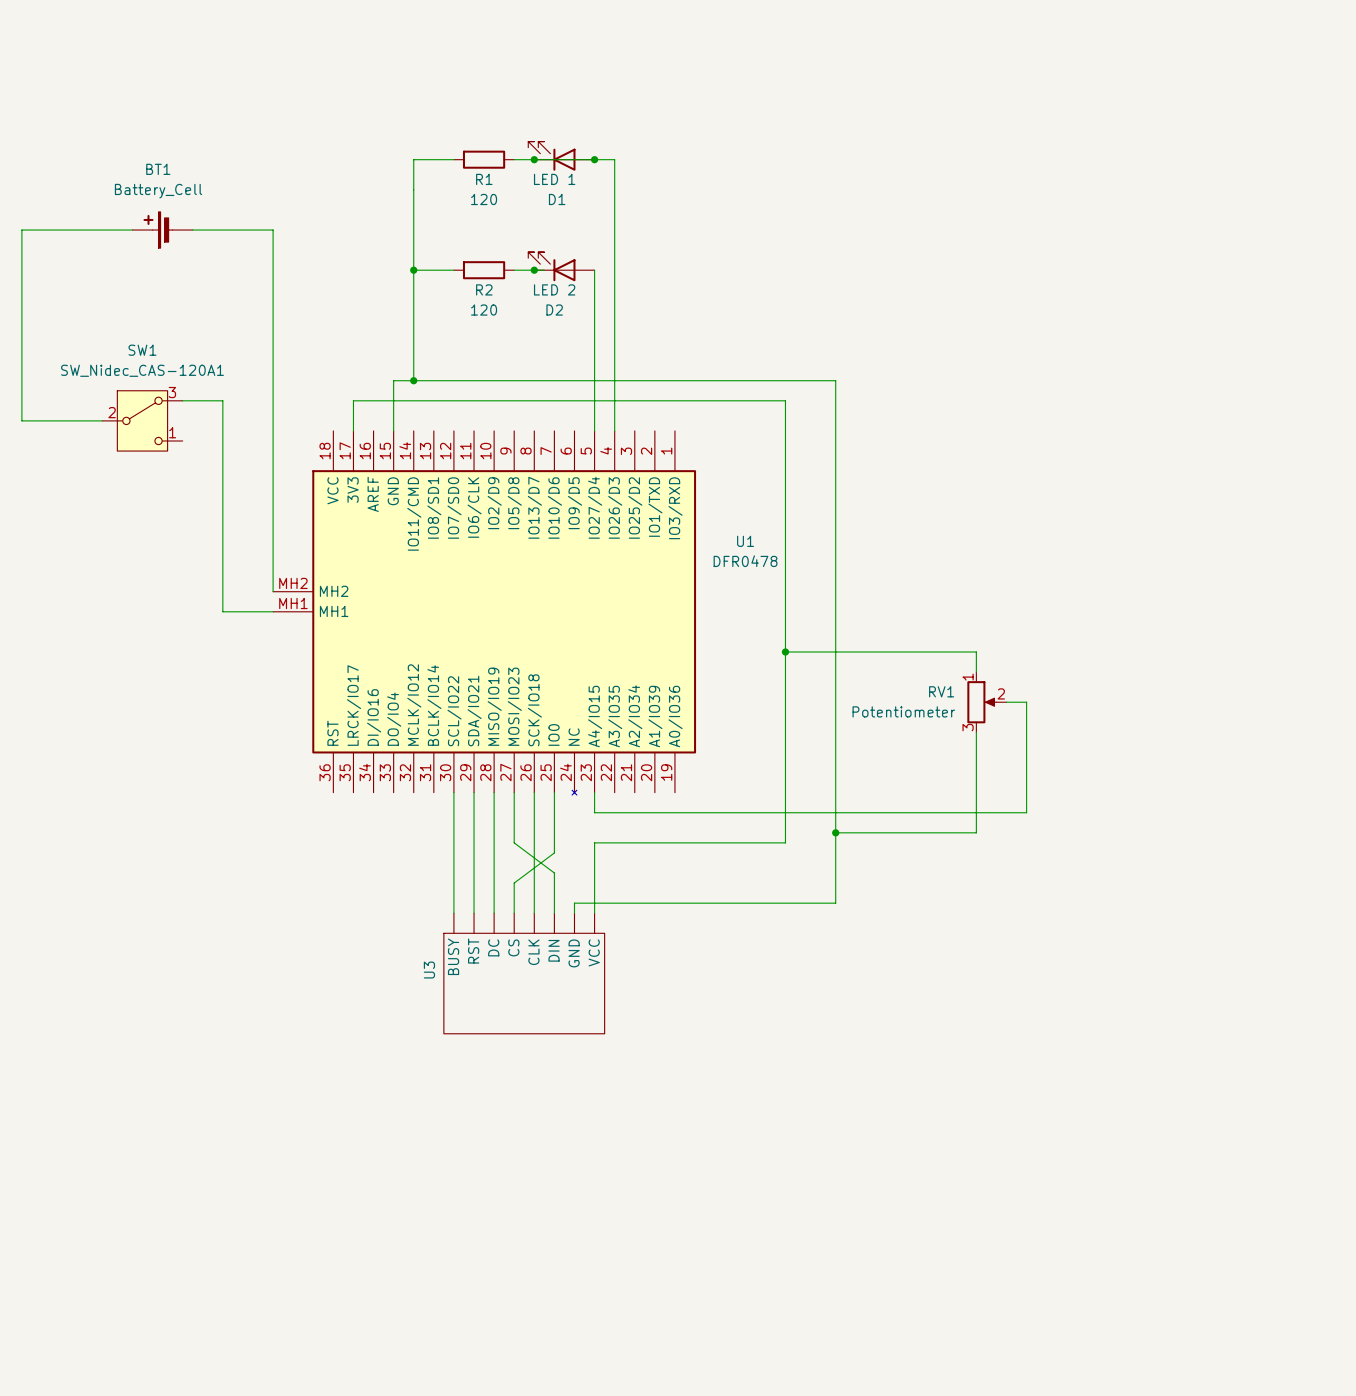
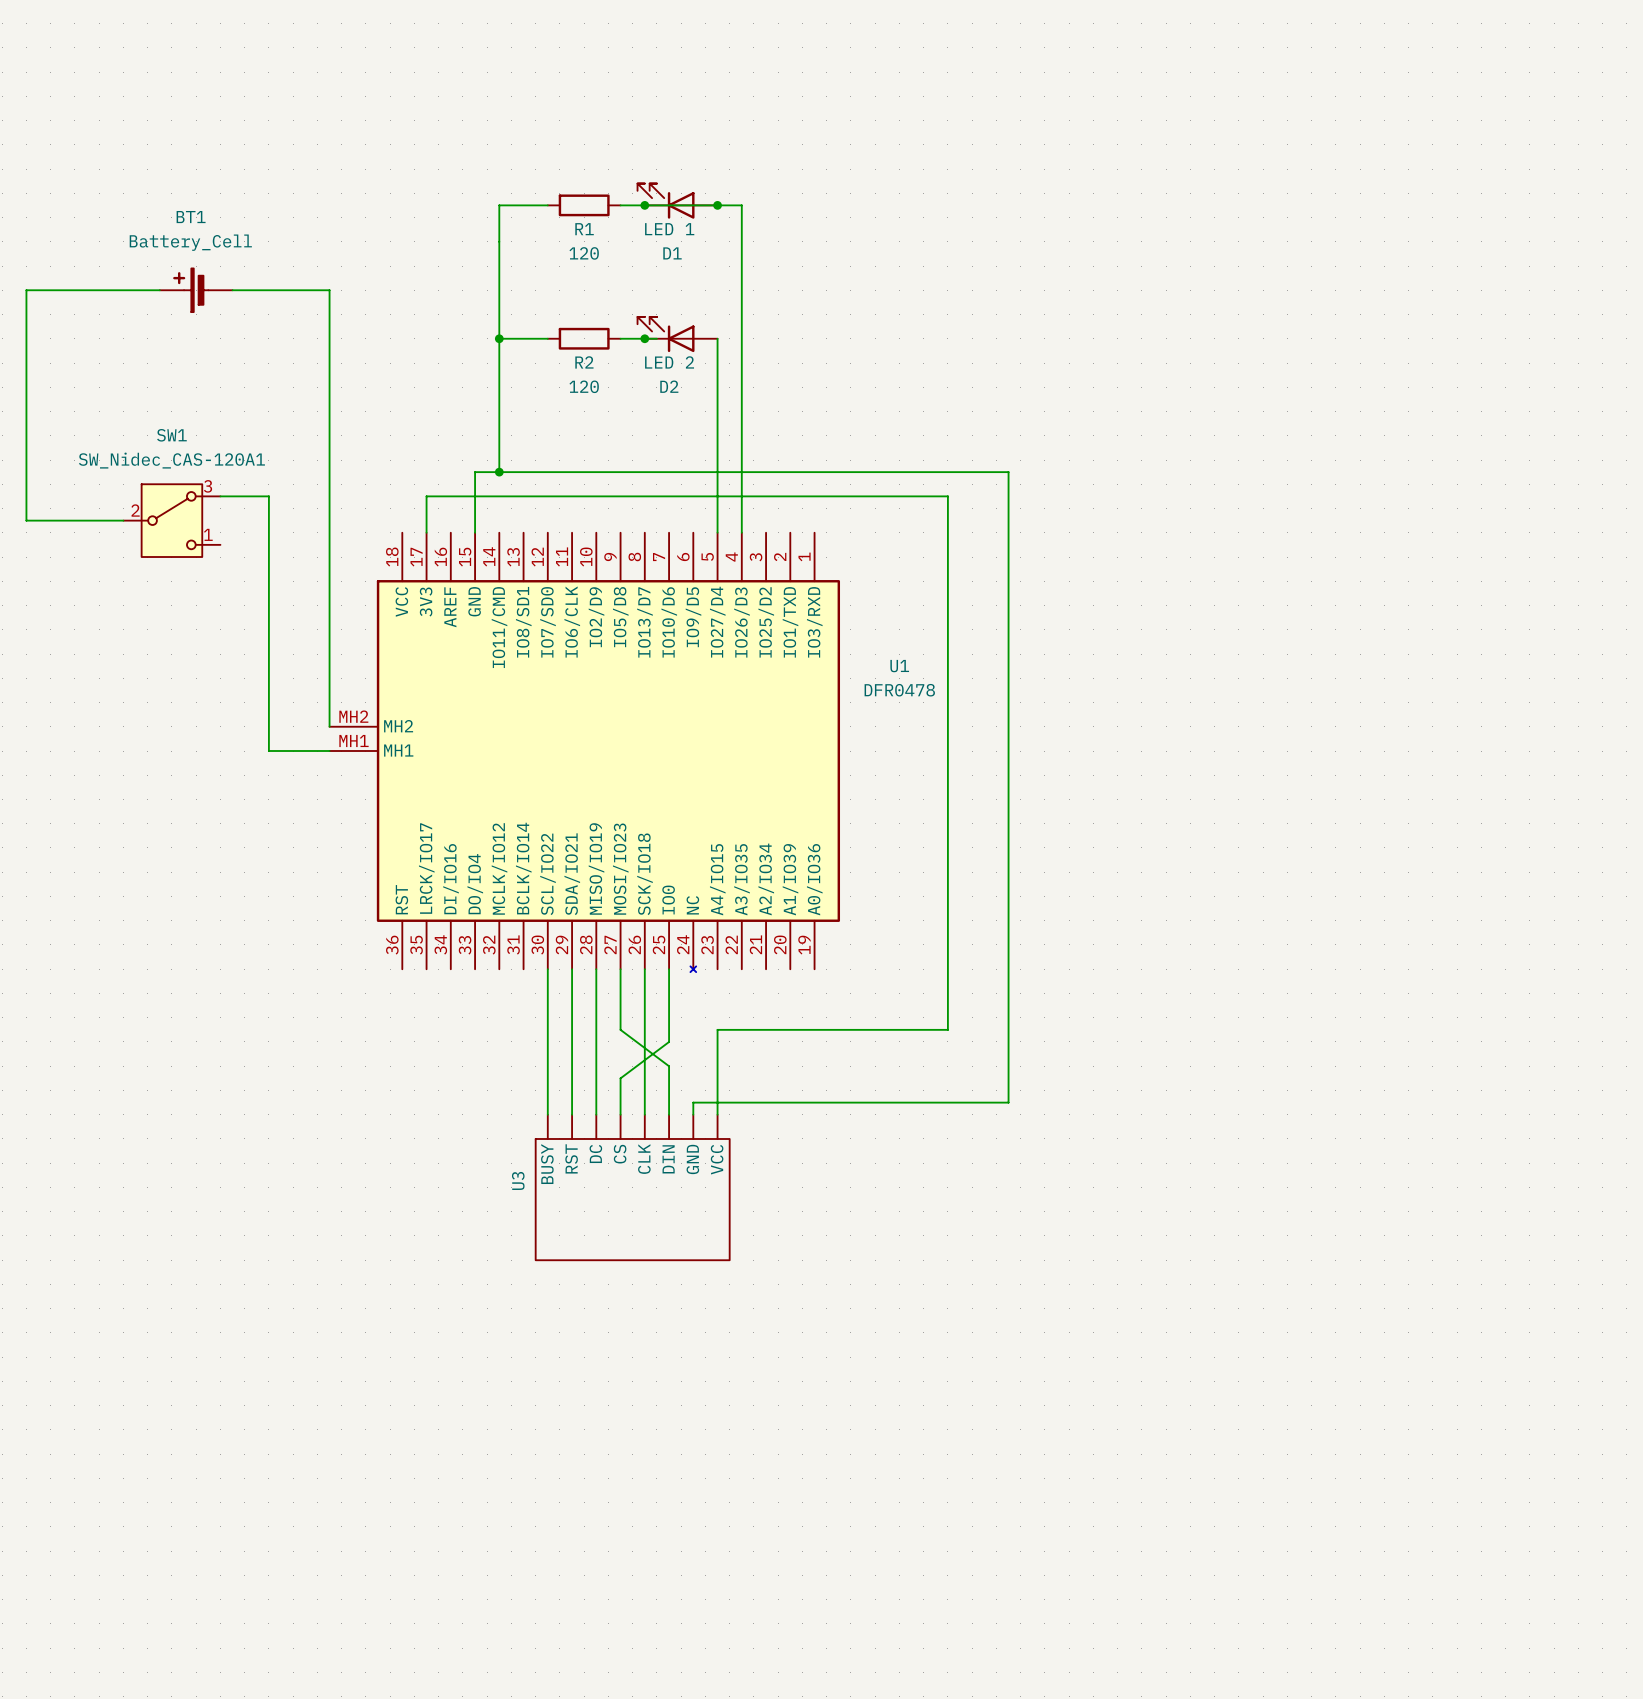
wire: (785, 651) (976, 651) (976, 672) -> none
junction: (785, 651) -> none
RV1: Potentiometer (986, 702) -> none
wire: (1006, 702) (1026, 702) (1026, 812) (594, 812) (594, 792) -> none
wire: (976, 732) (976, 832) (835, 832) -> none
junction: (835, 832) -> none

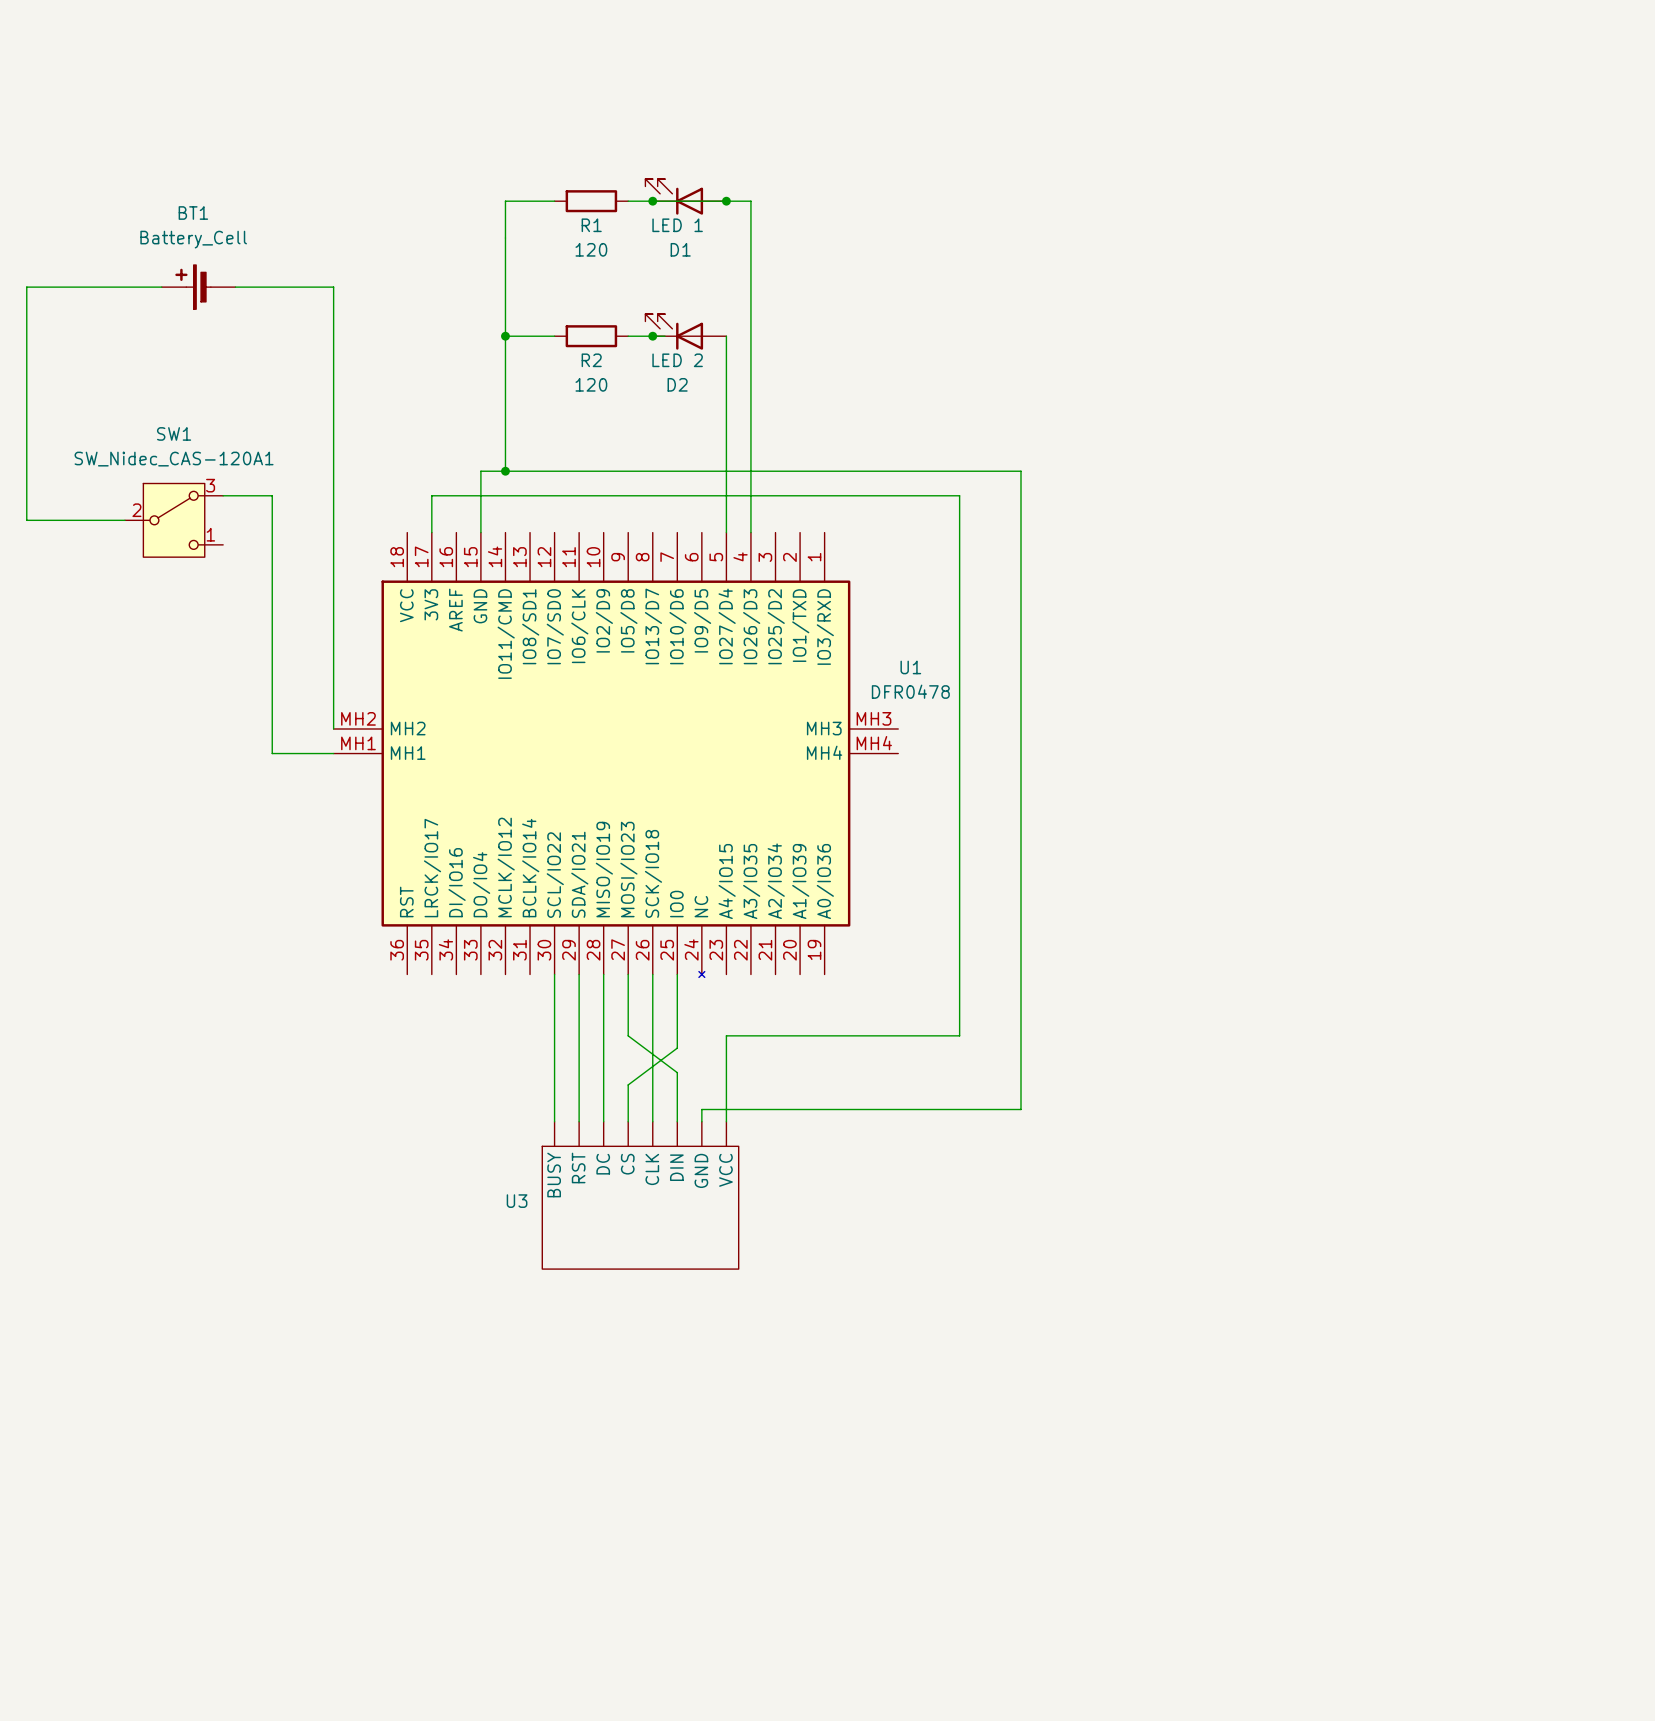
U1 symbol: [329, 532, 841, 973] -> [333, 532, 899, 978]
U3 name rotation: 0° (518, 1180) -> 90° clockwise (517, 1201)

